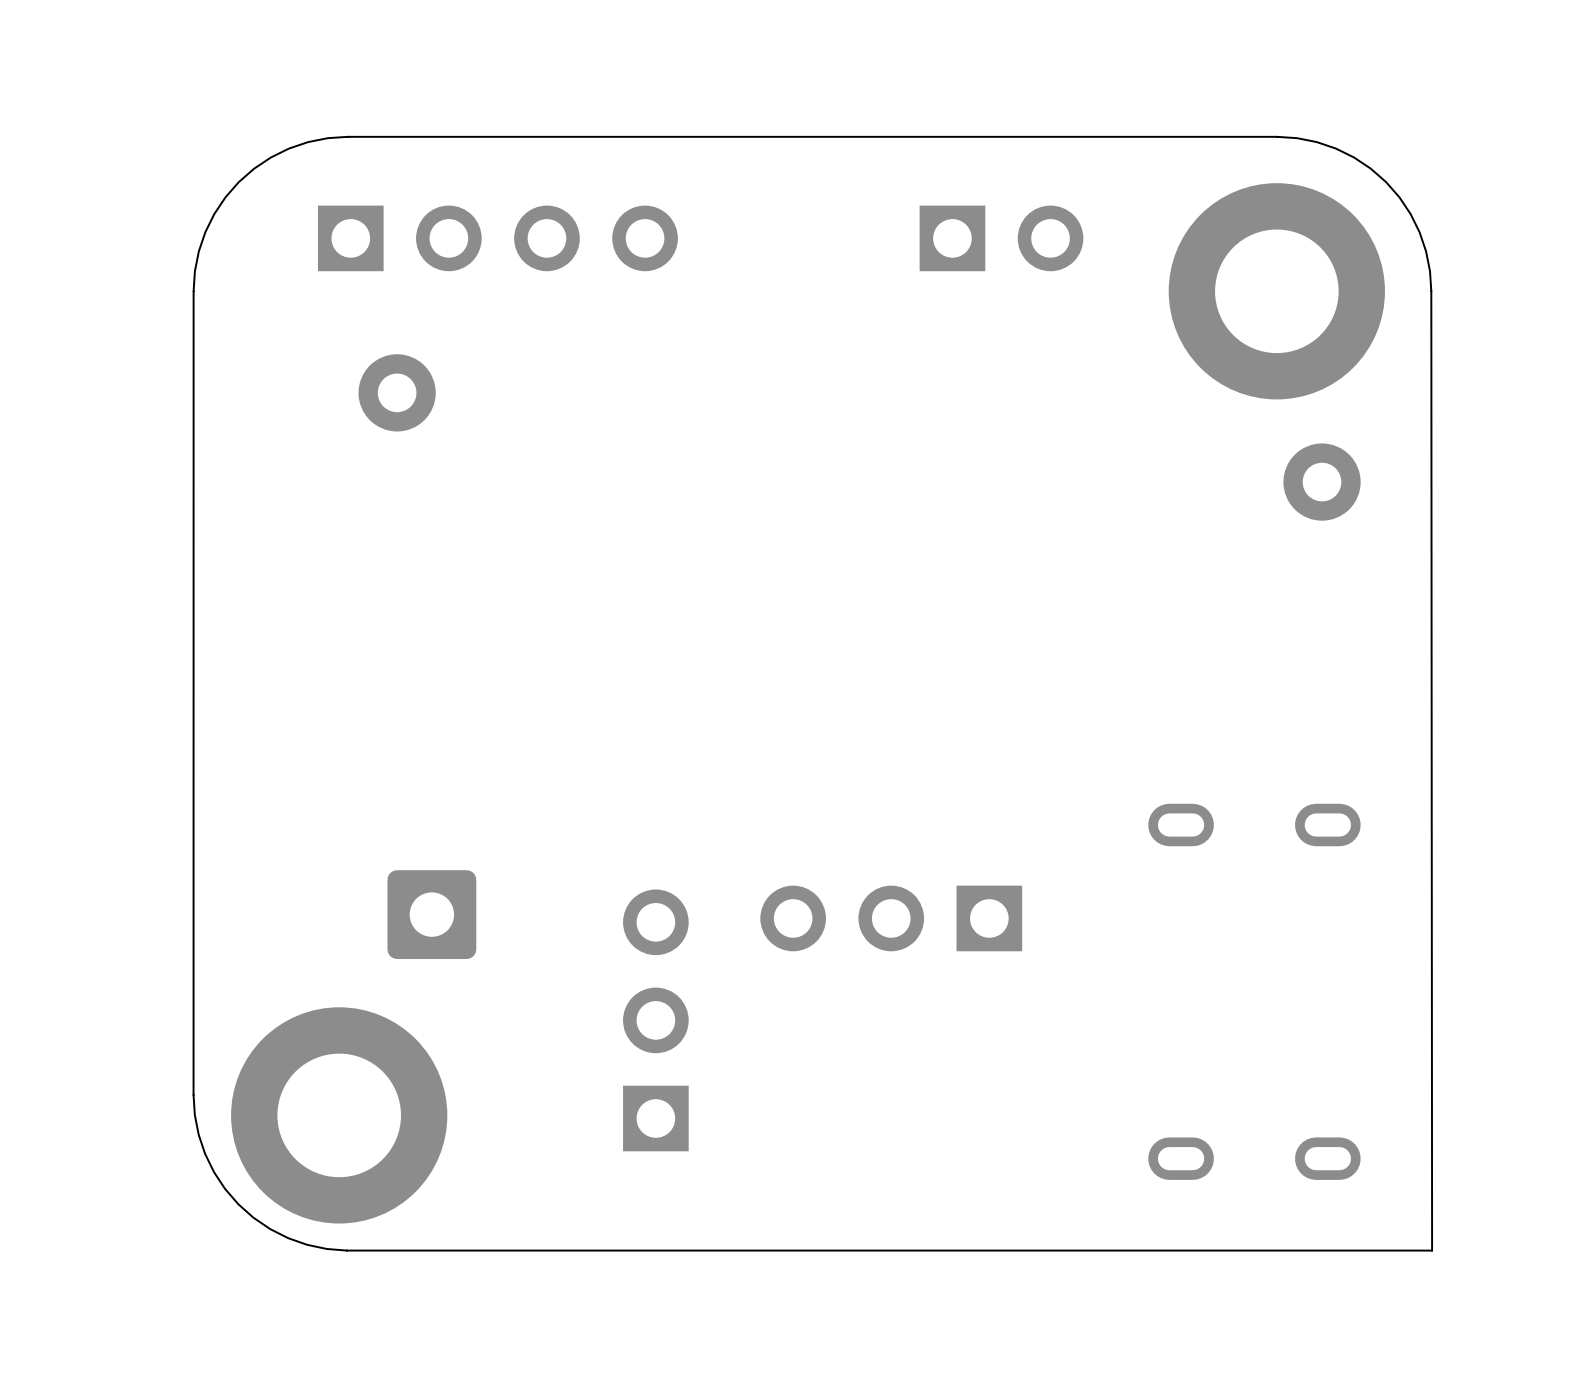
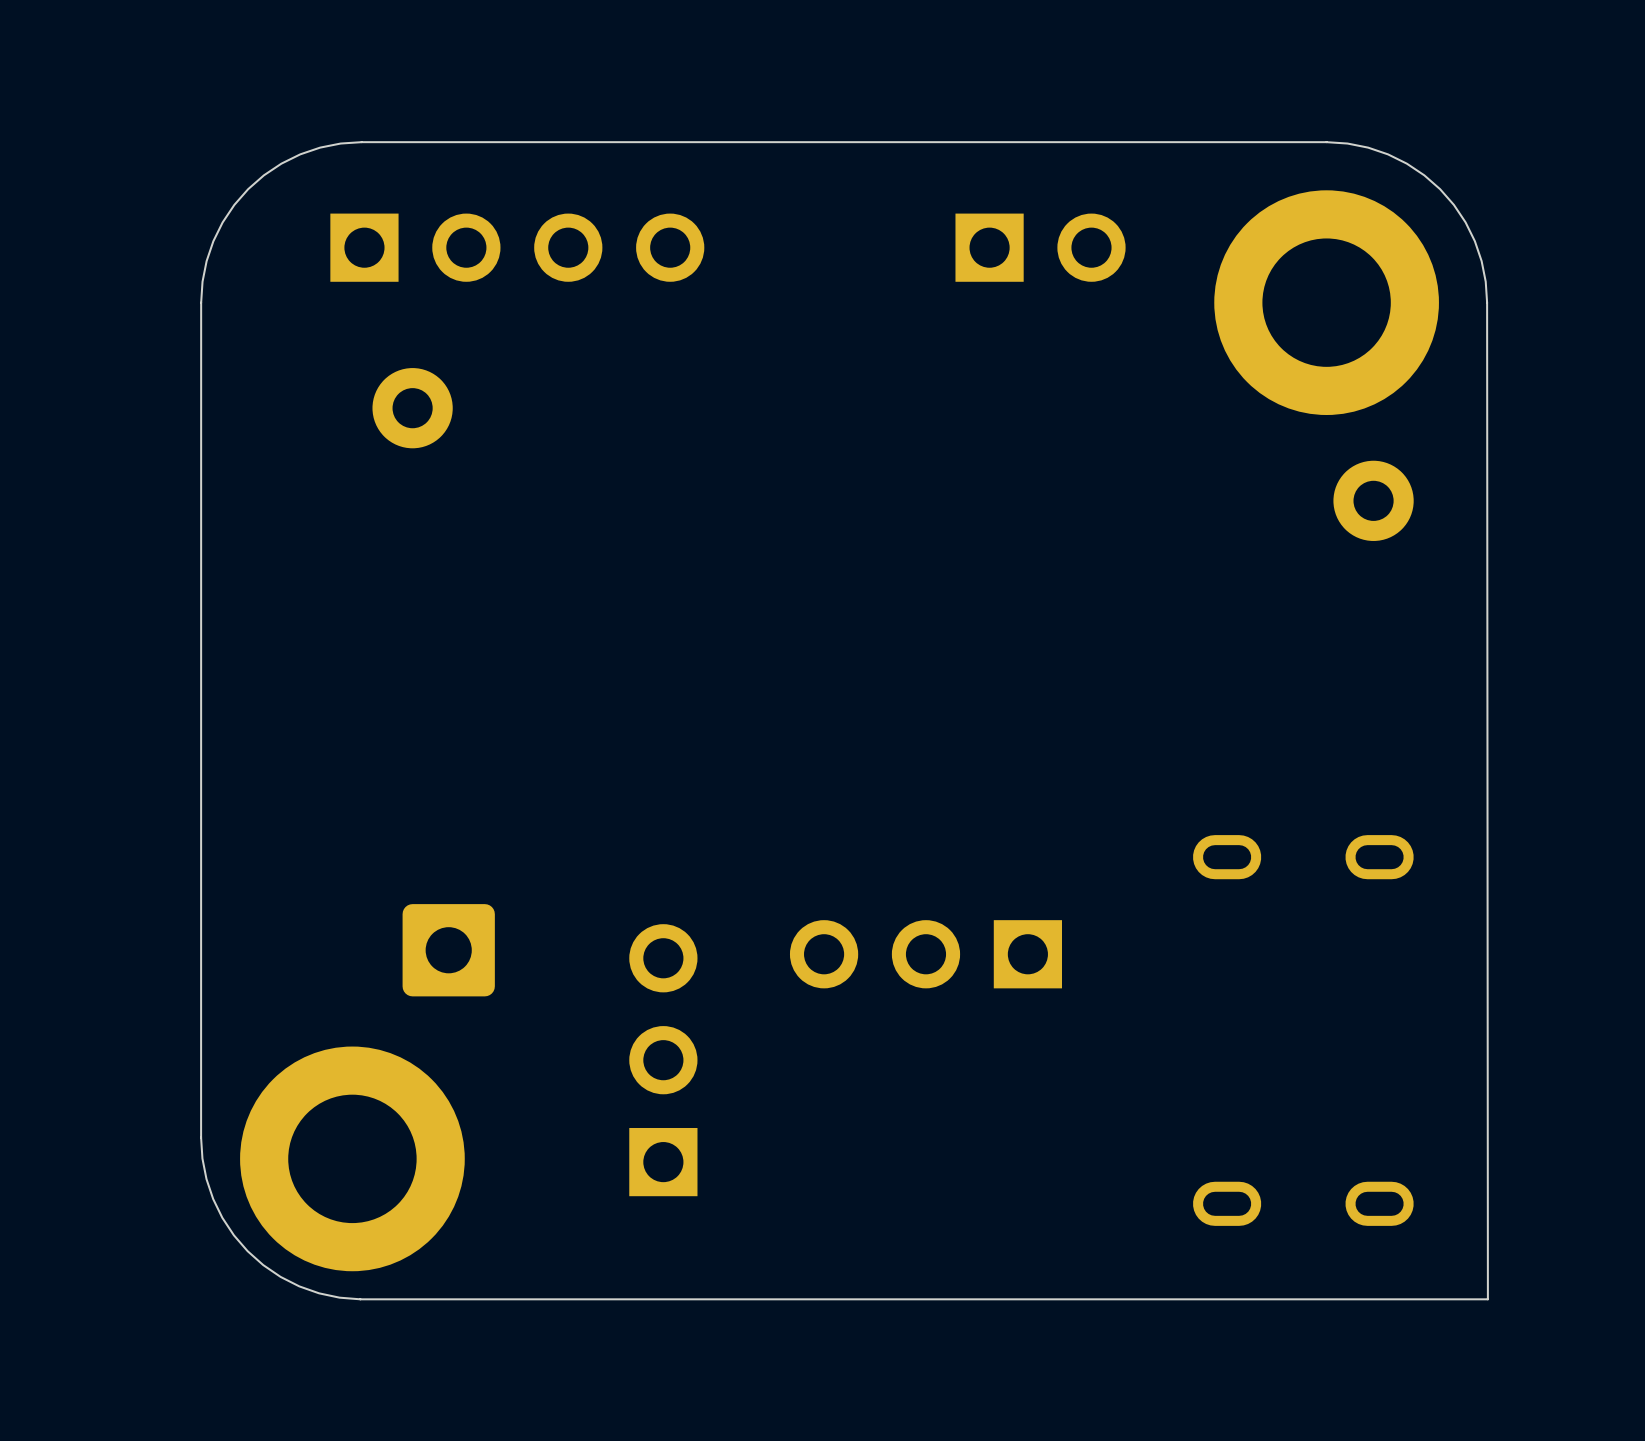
part position: (655, 1020) -> (663, 1060)

